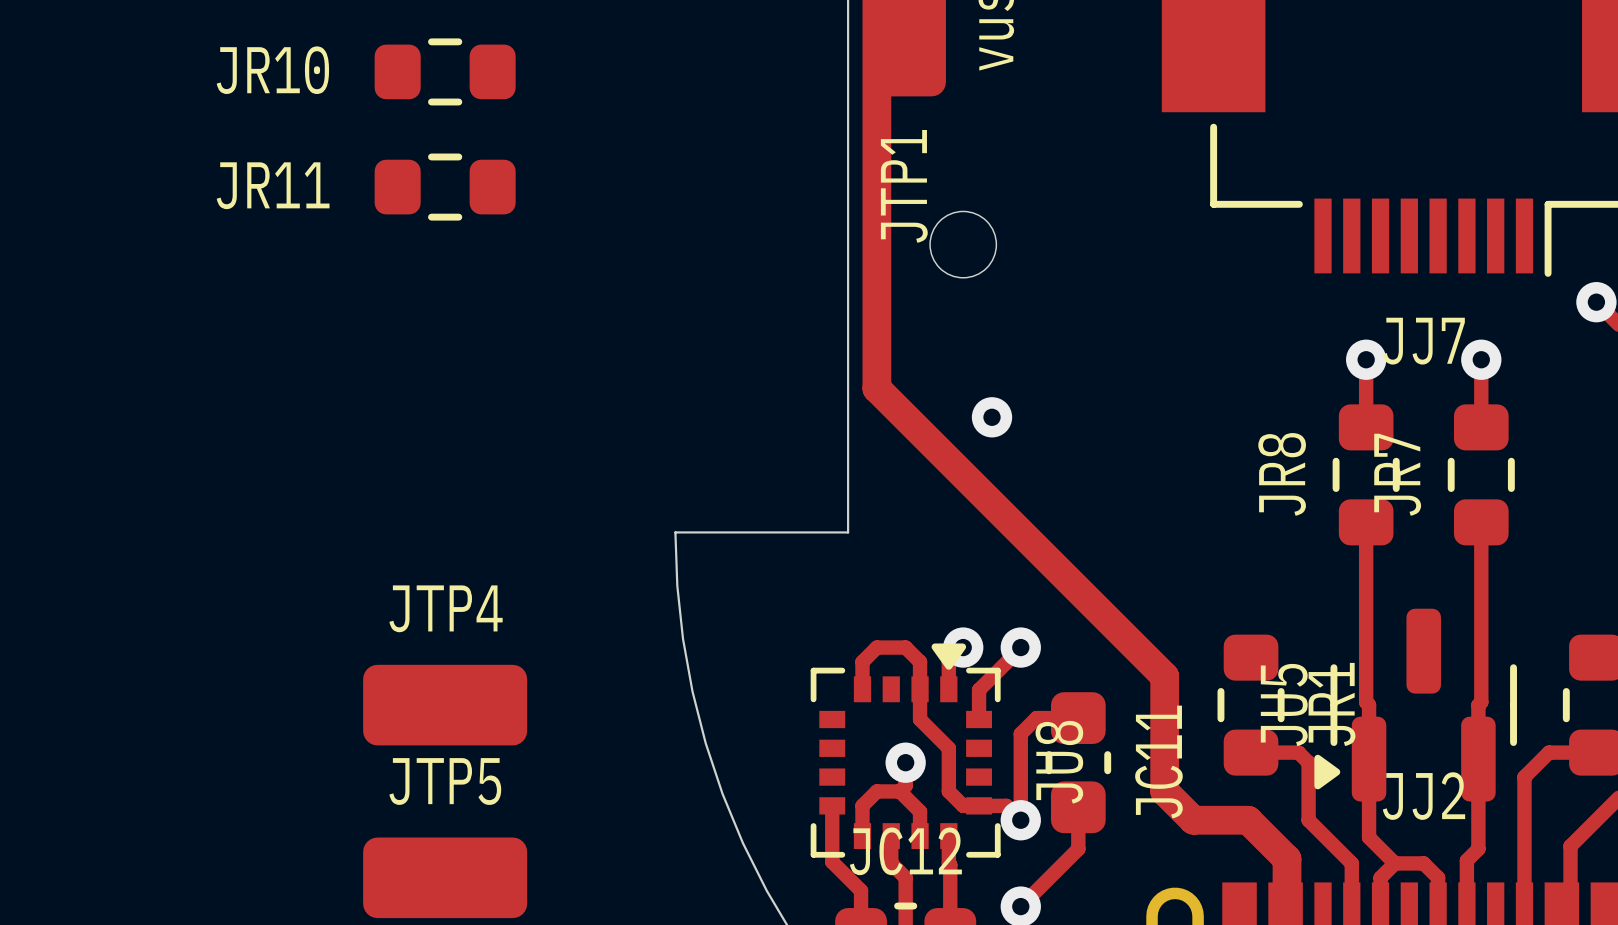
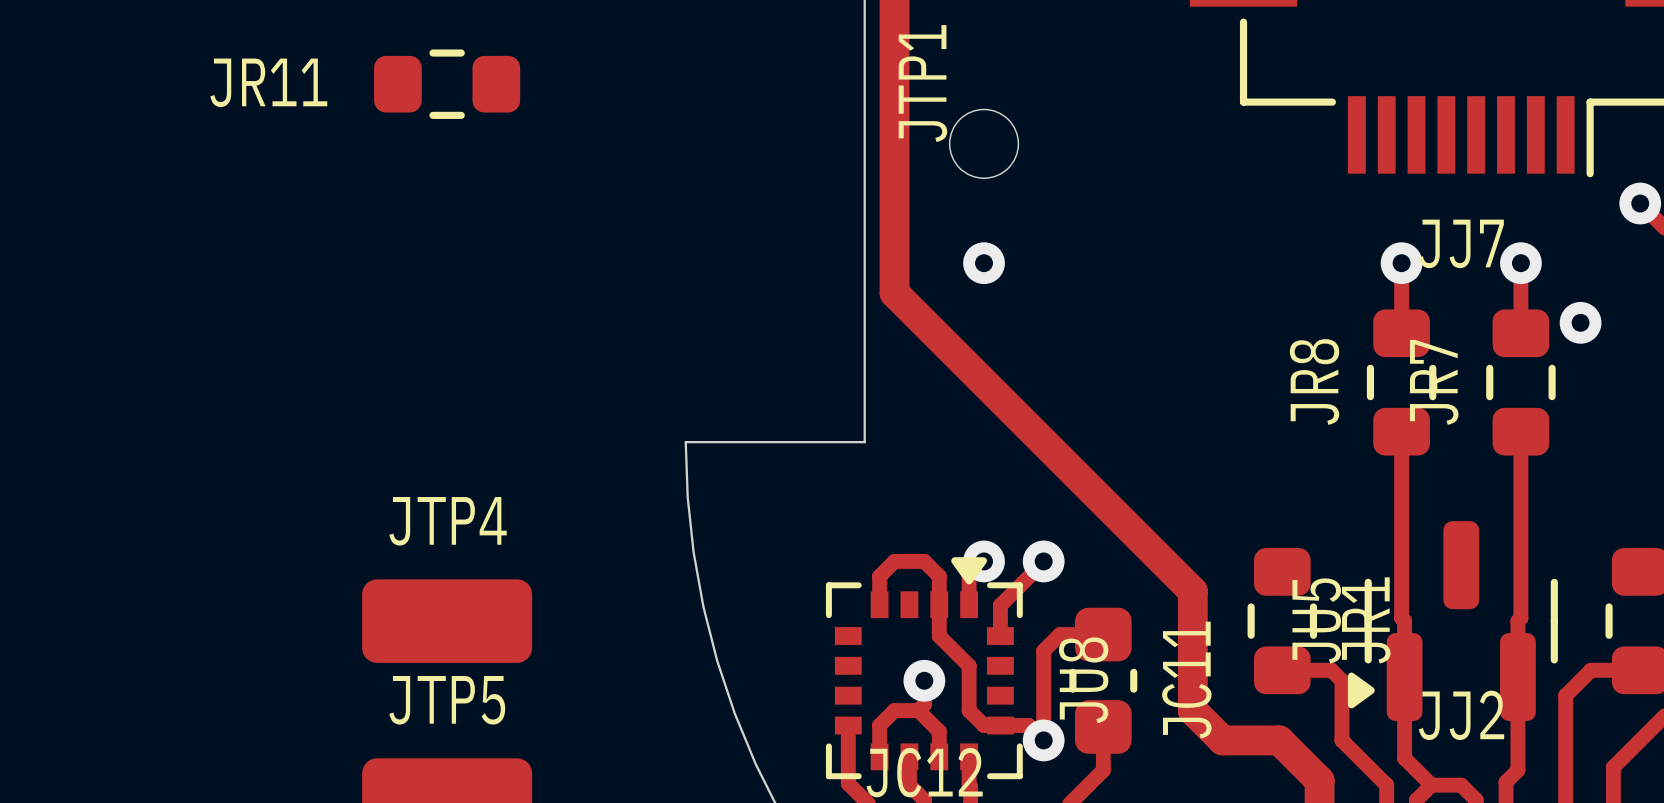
via position: (992, 417) -> (984, 263)
via: none -> (1580, 322)

